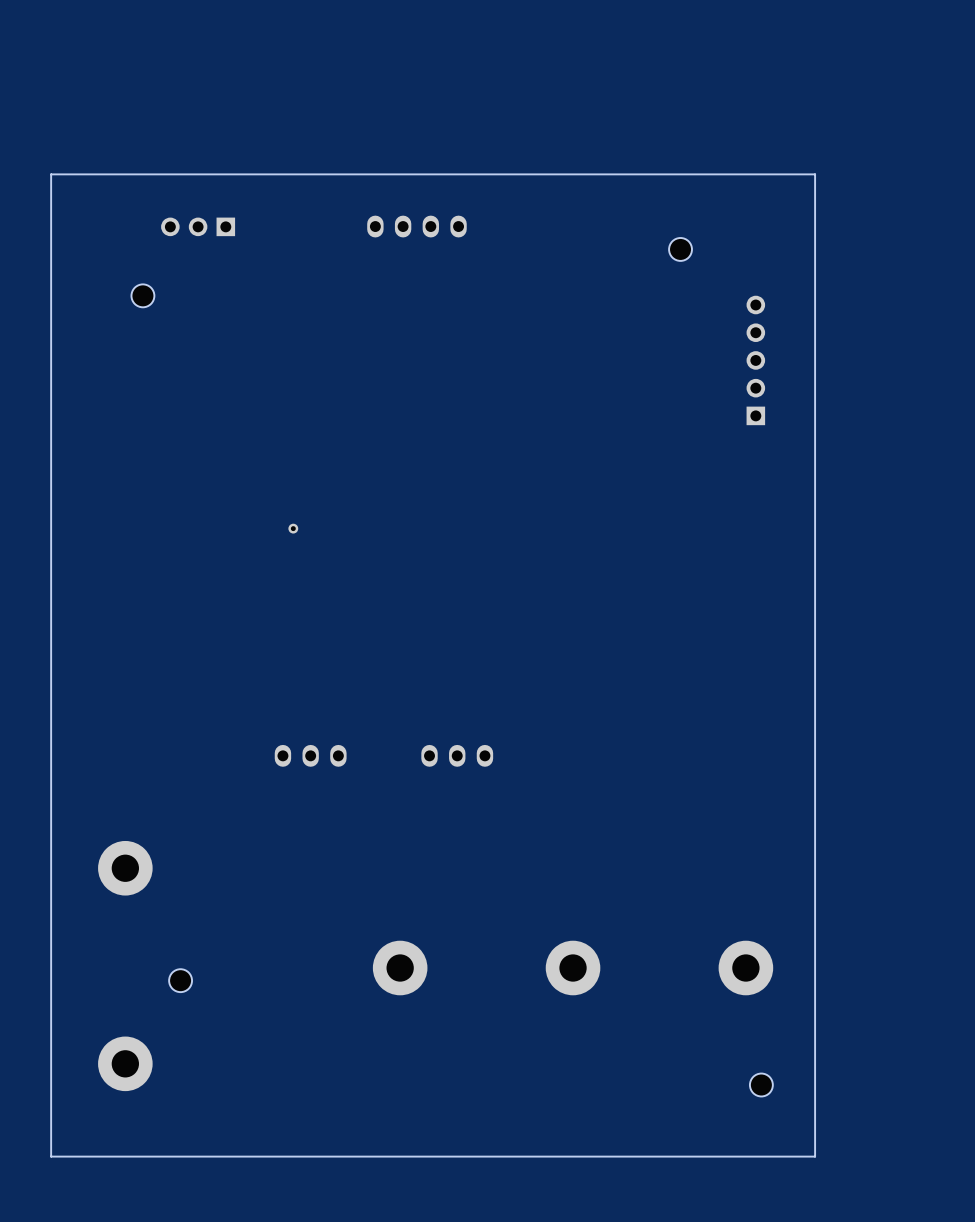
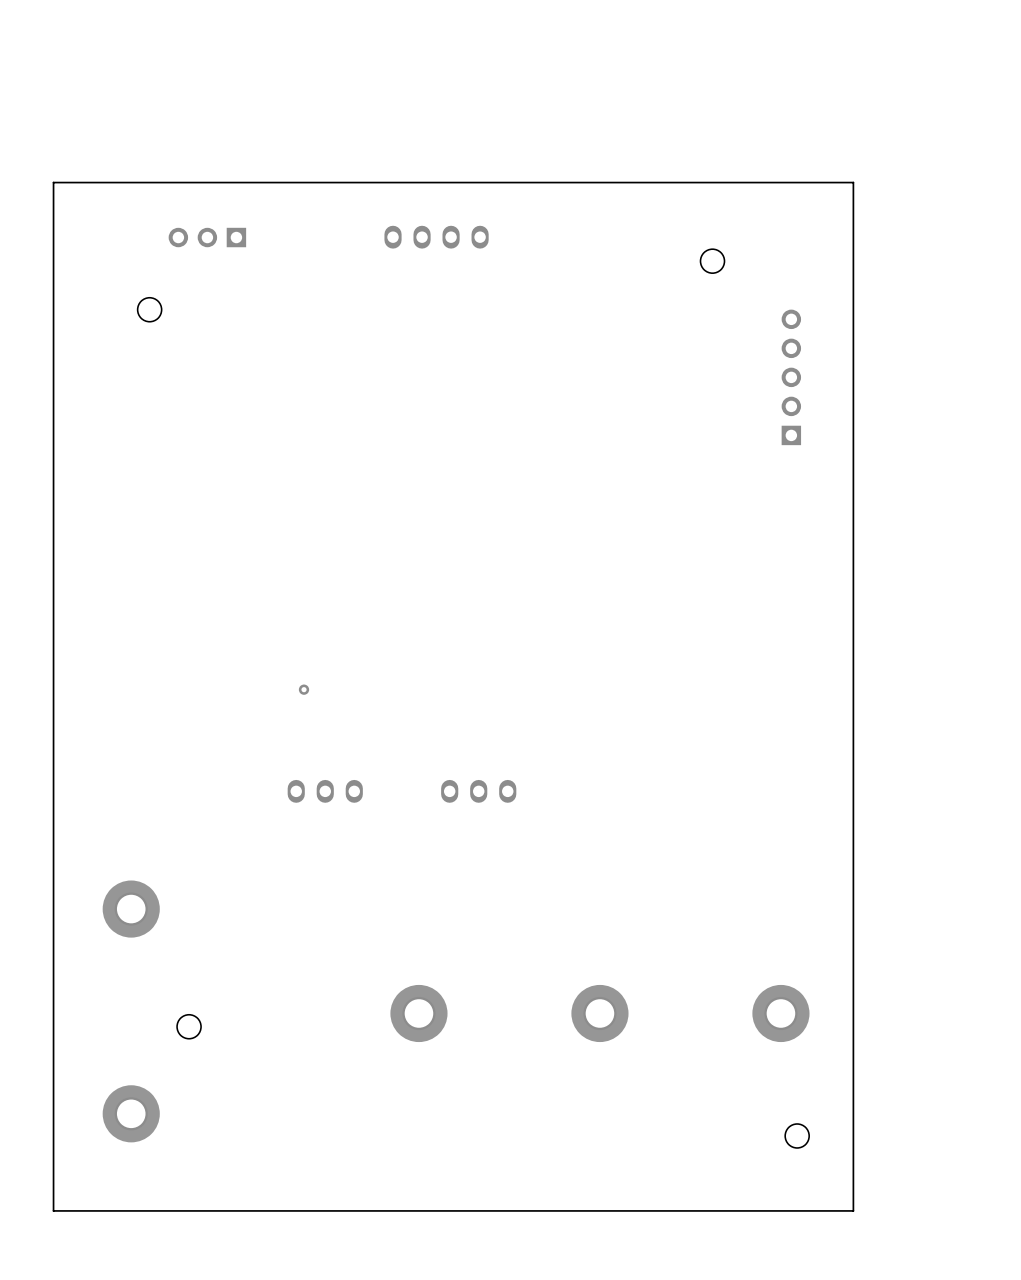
part position: (293, 528) -> (304, 689)

